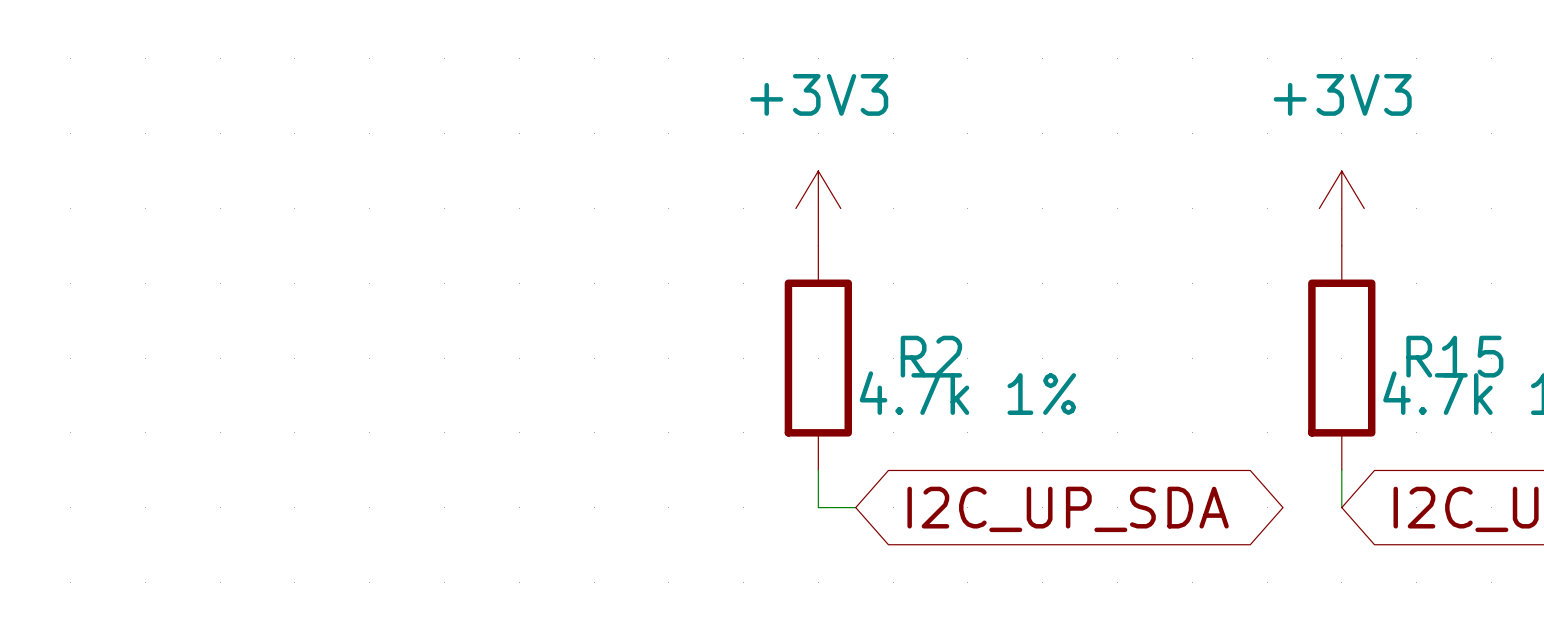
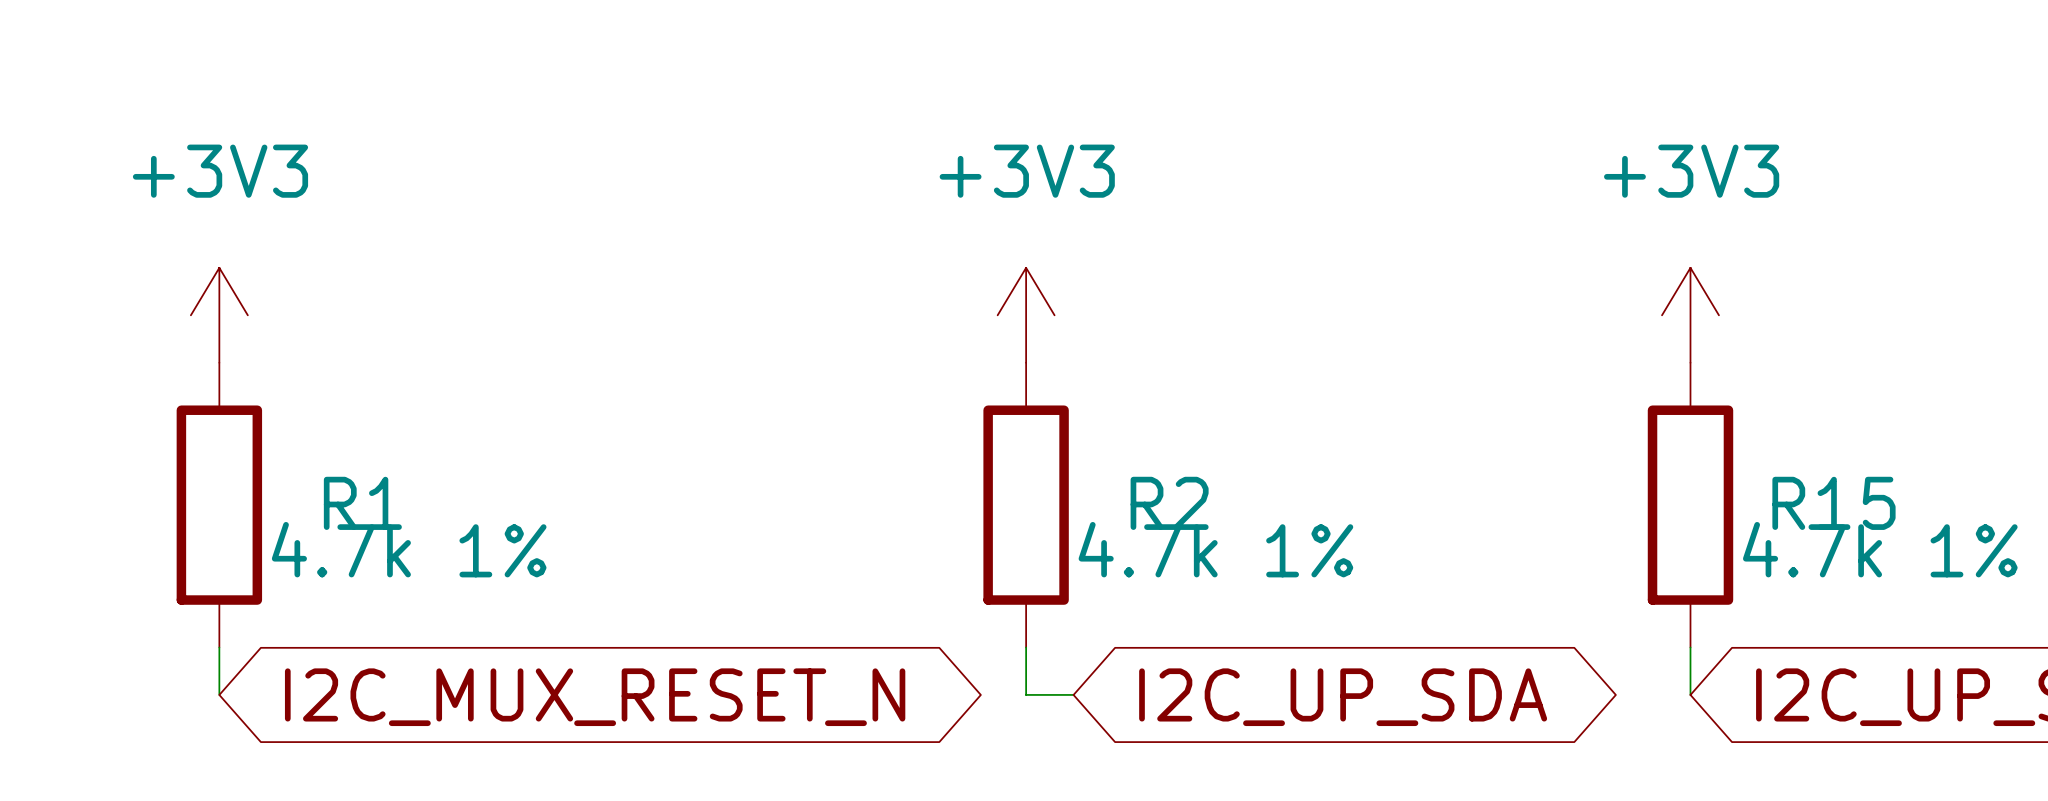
power symbol: none -> +3V3 (219, 315)
R1: none -> 4.7k 1% (219, 505)
wire: none -> (219, 647) (219, 694)
global label: none -> I2C_MUX_RESET_N (595, 697)

